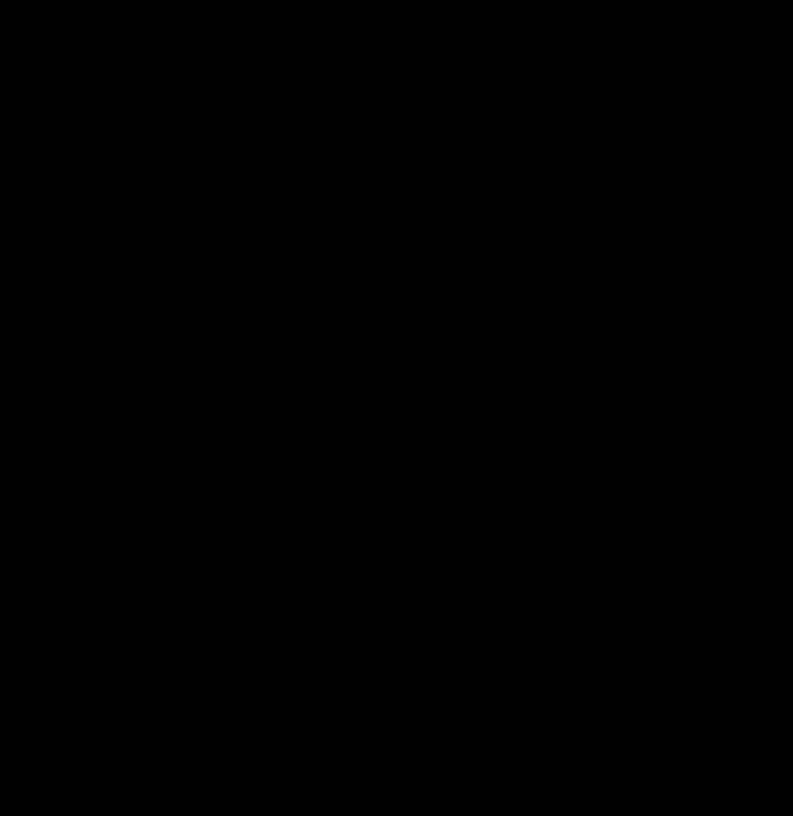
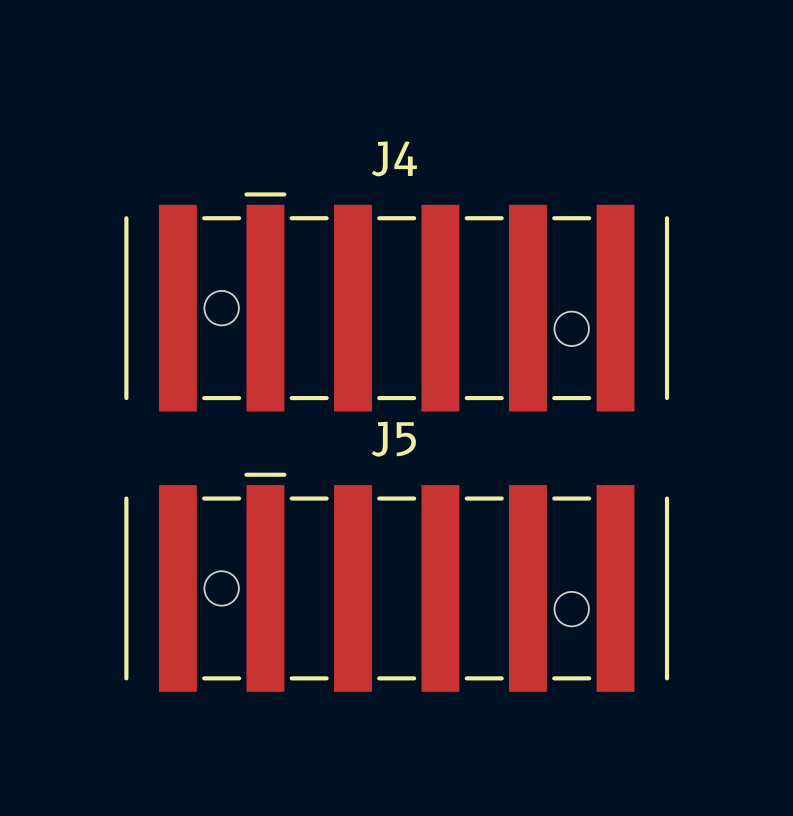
J4: none -> (396, 301)
J5: none -> (396, 582)

